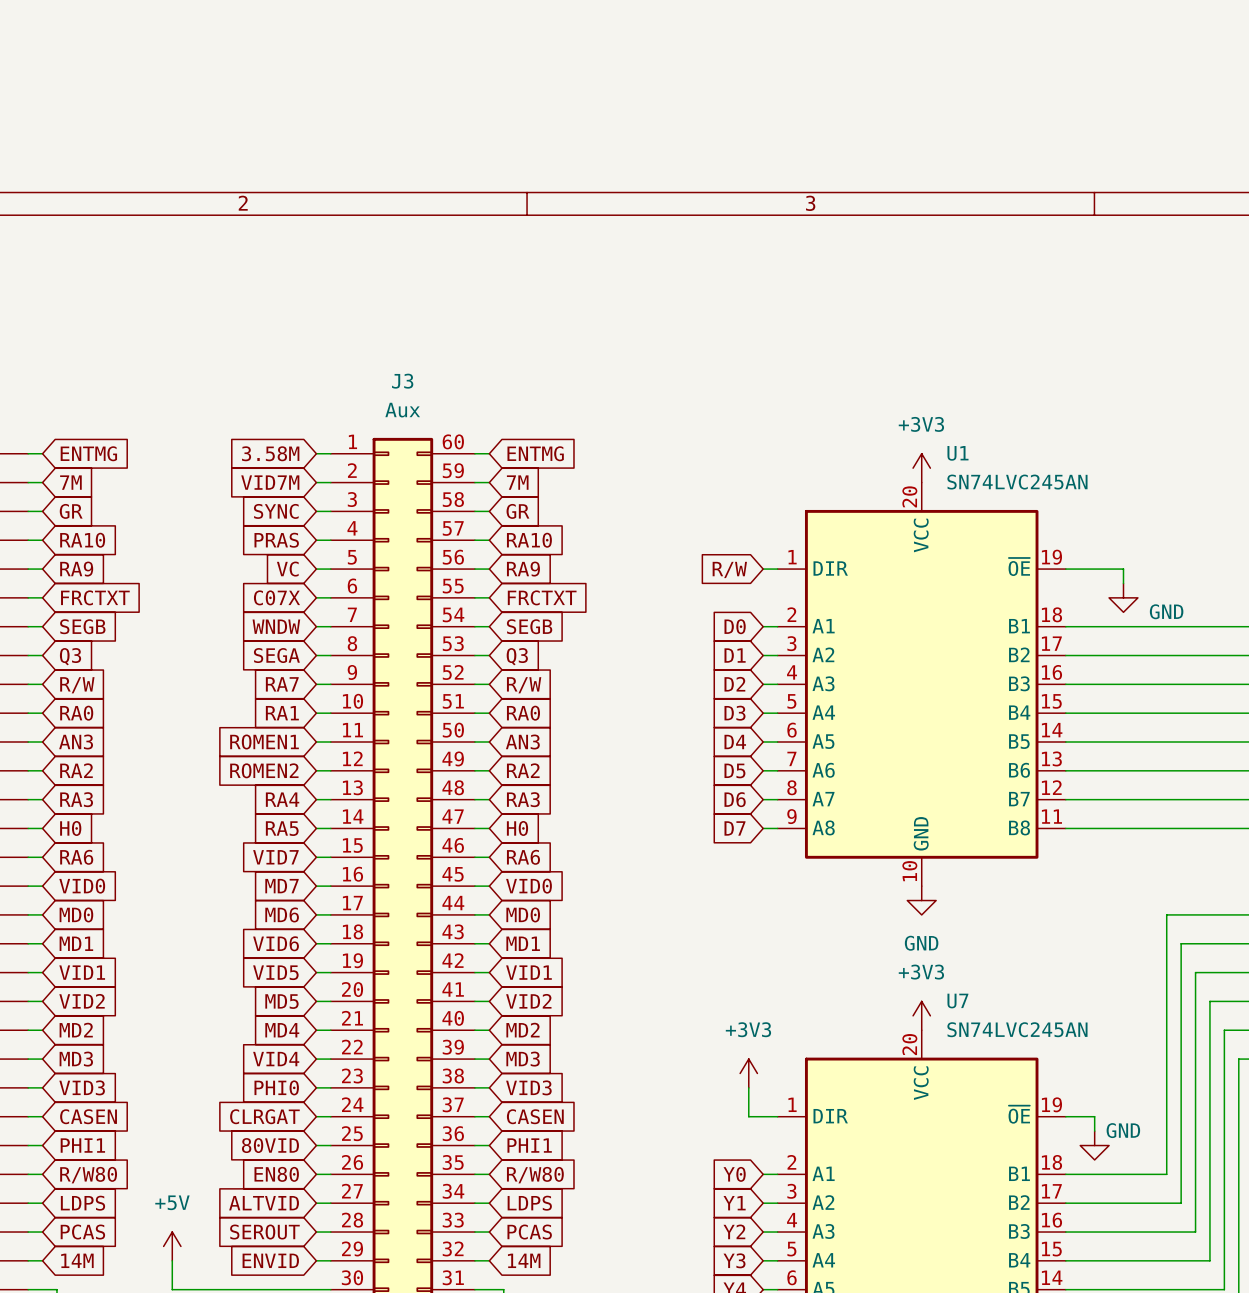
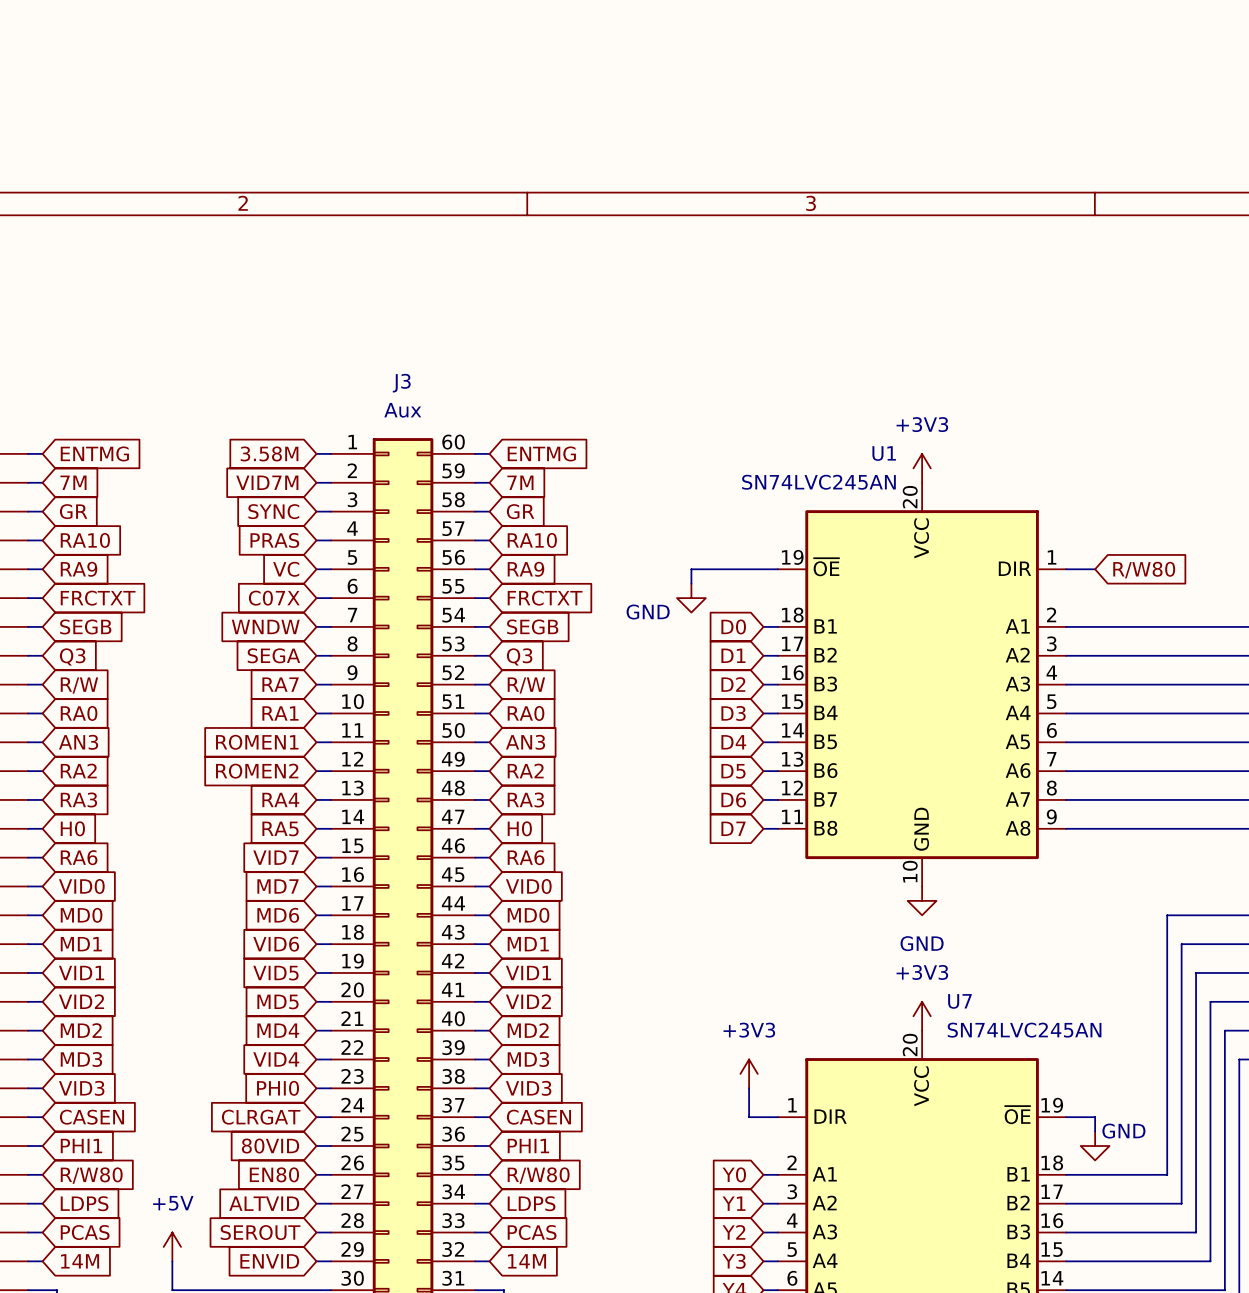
global label: R/W (729, 569) -> none
wire: none -> (763, 569) (691, 569) (691, 583)
wire: (1094, 569) (1123, 569) (1123, 583) -> none
global label: none -> R/W80 (1144, 570)
power symbol: none -> GND (691, 598)
power symbol: GND (1123, 597) -> none
U1 flip: as is (921, 684) -> left-right (922, 684)

